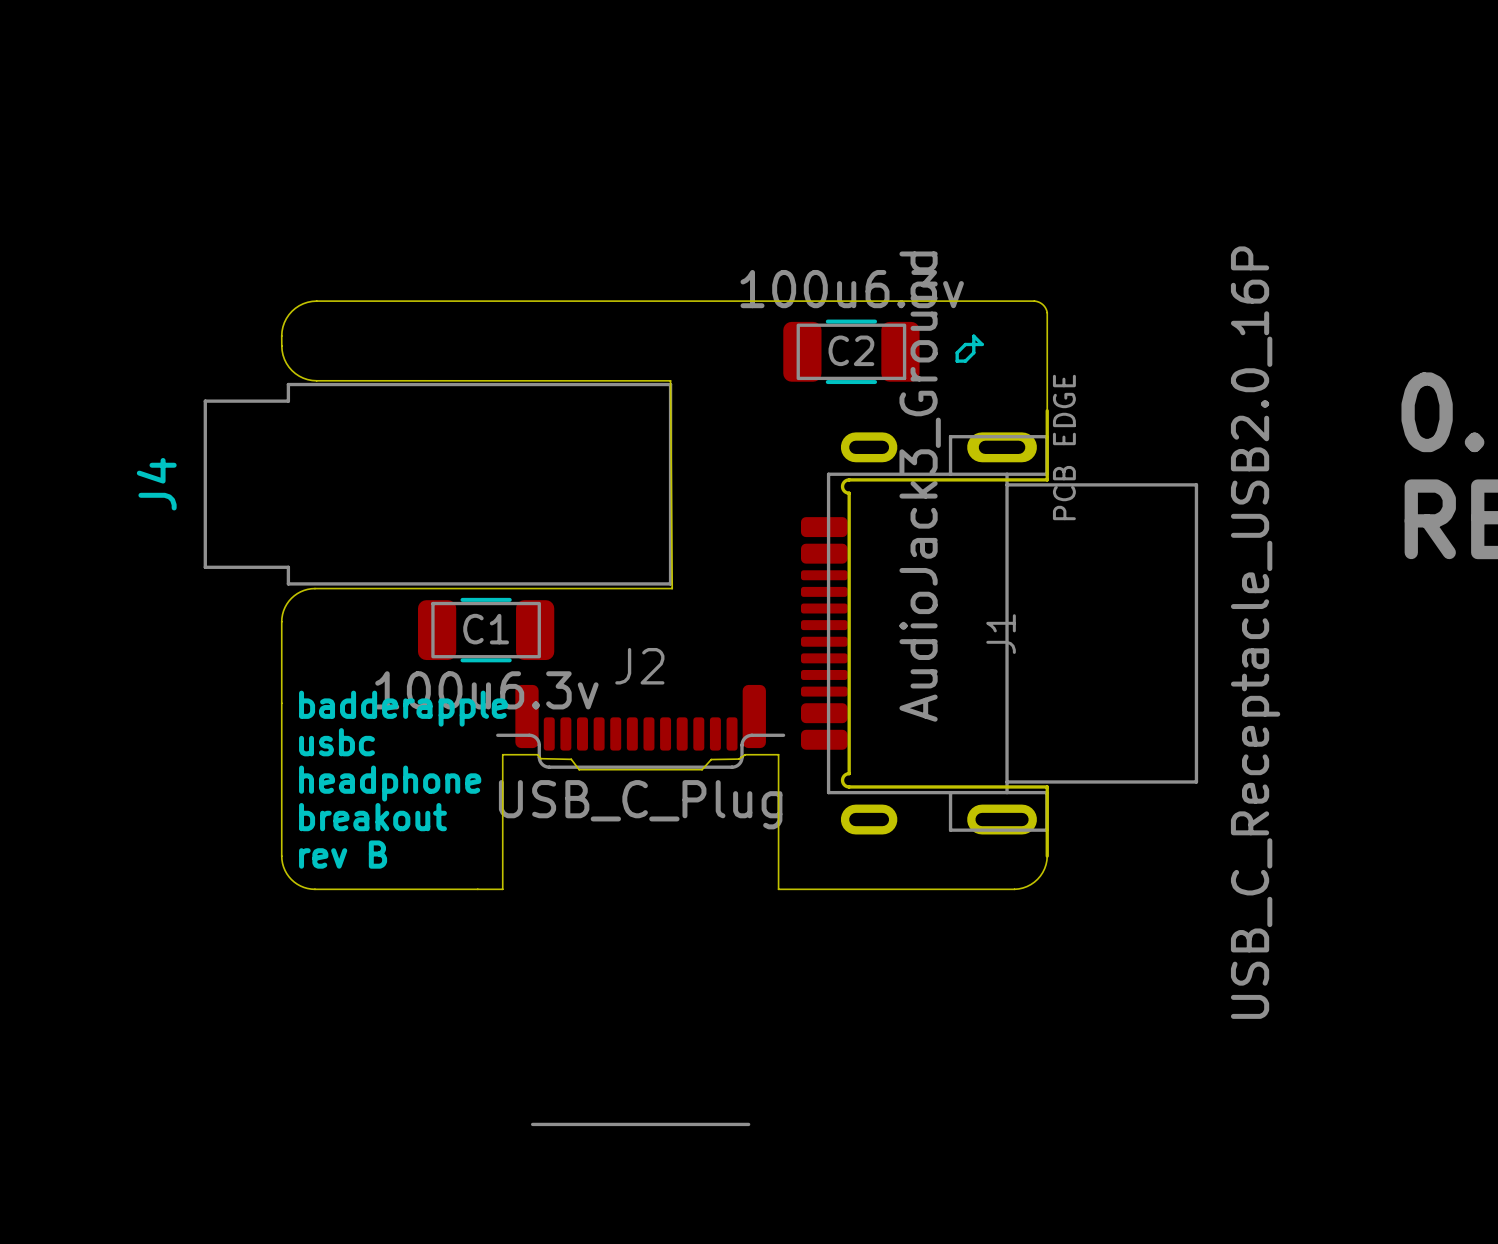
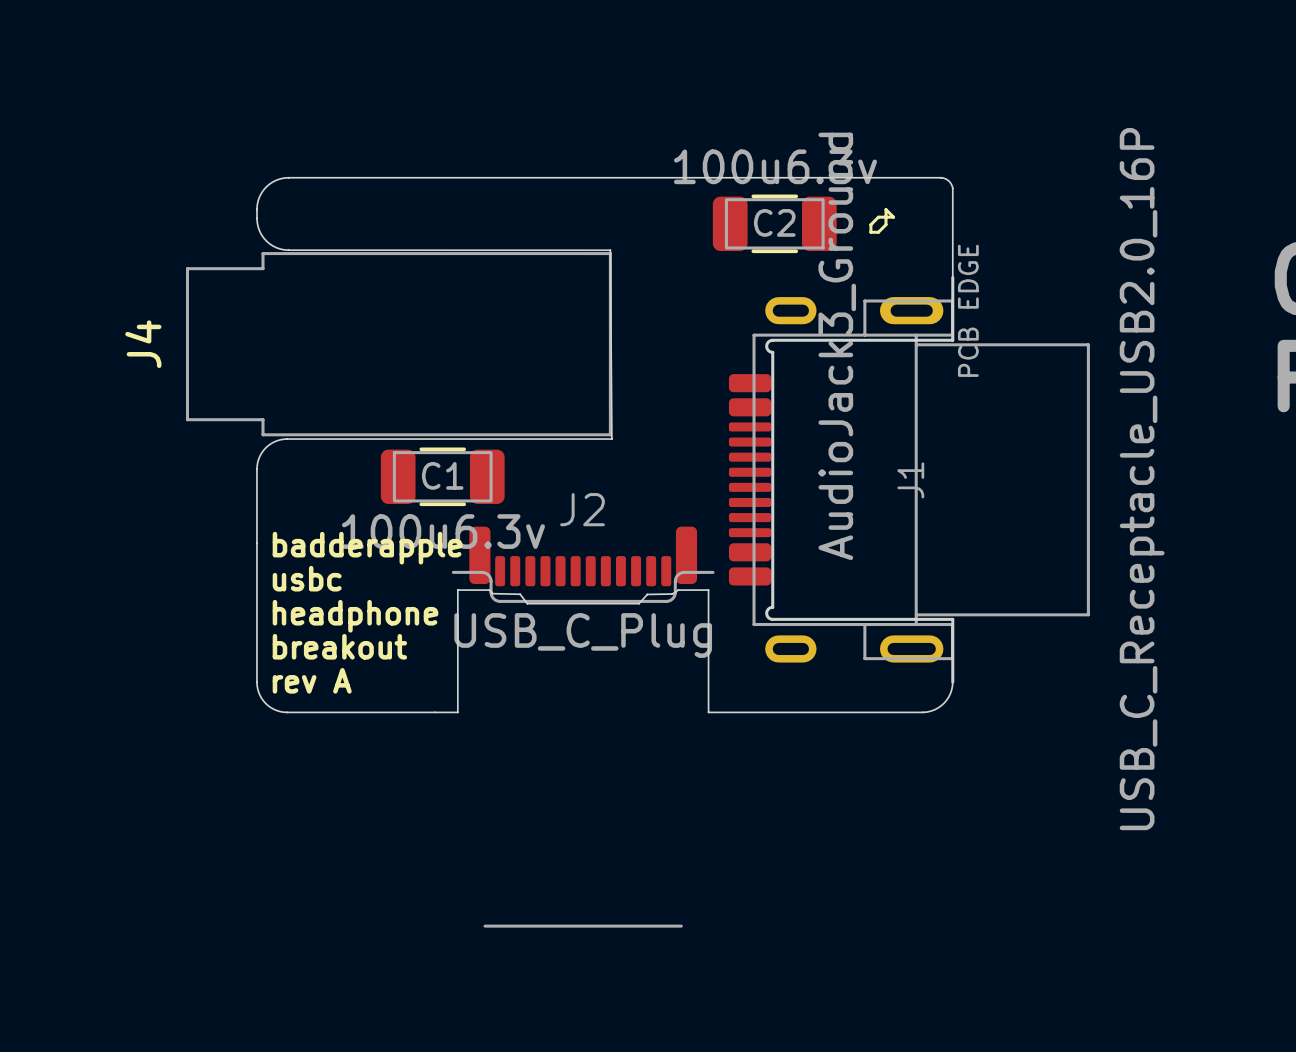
text: rev B (343, 854) -> rev A (312, 680)

